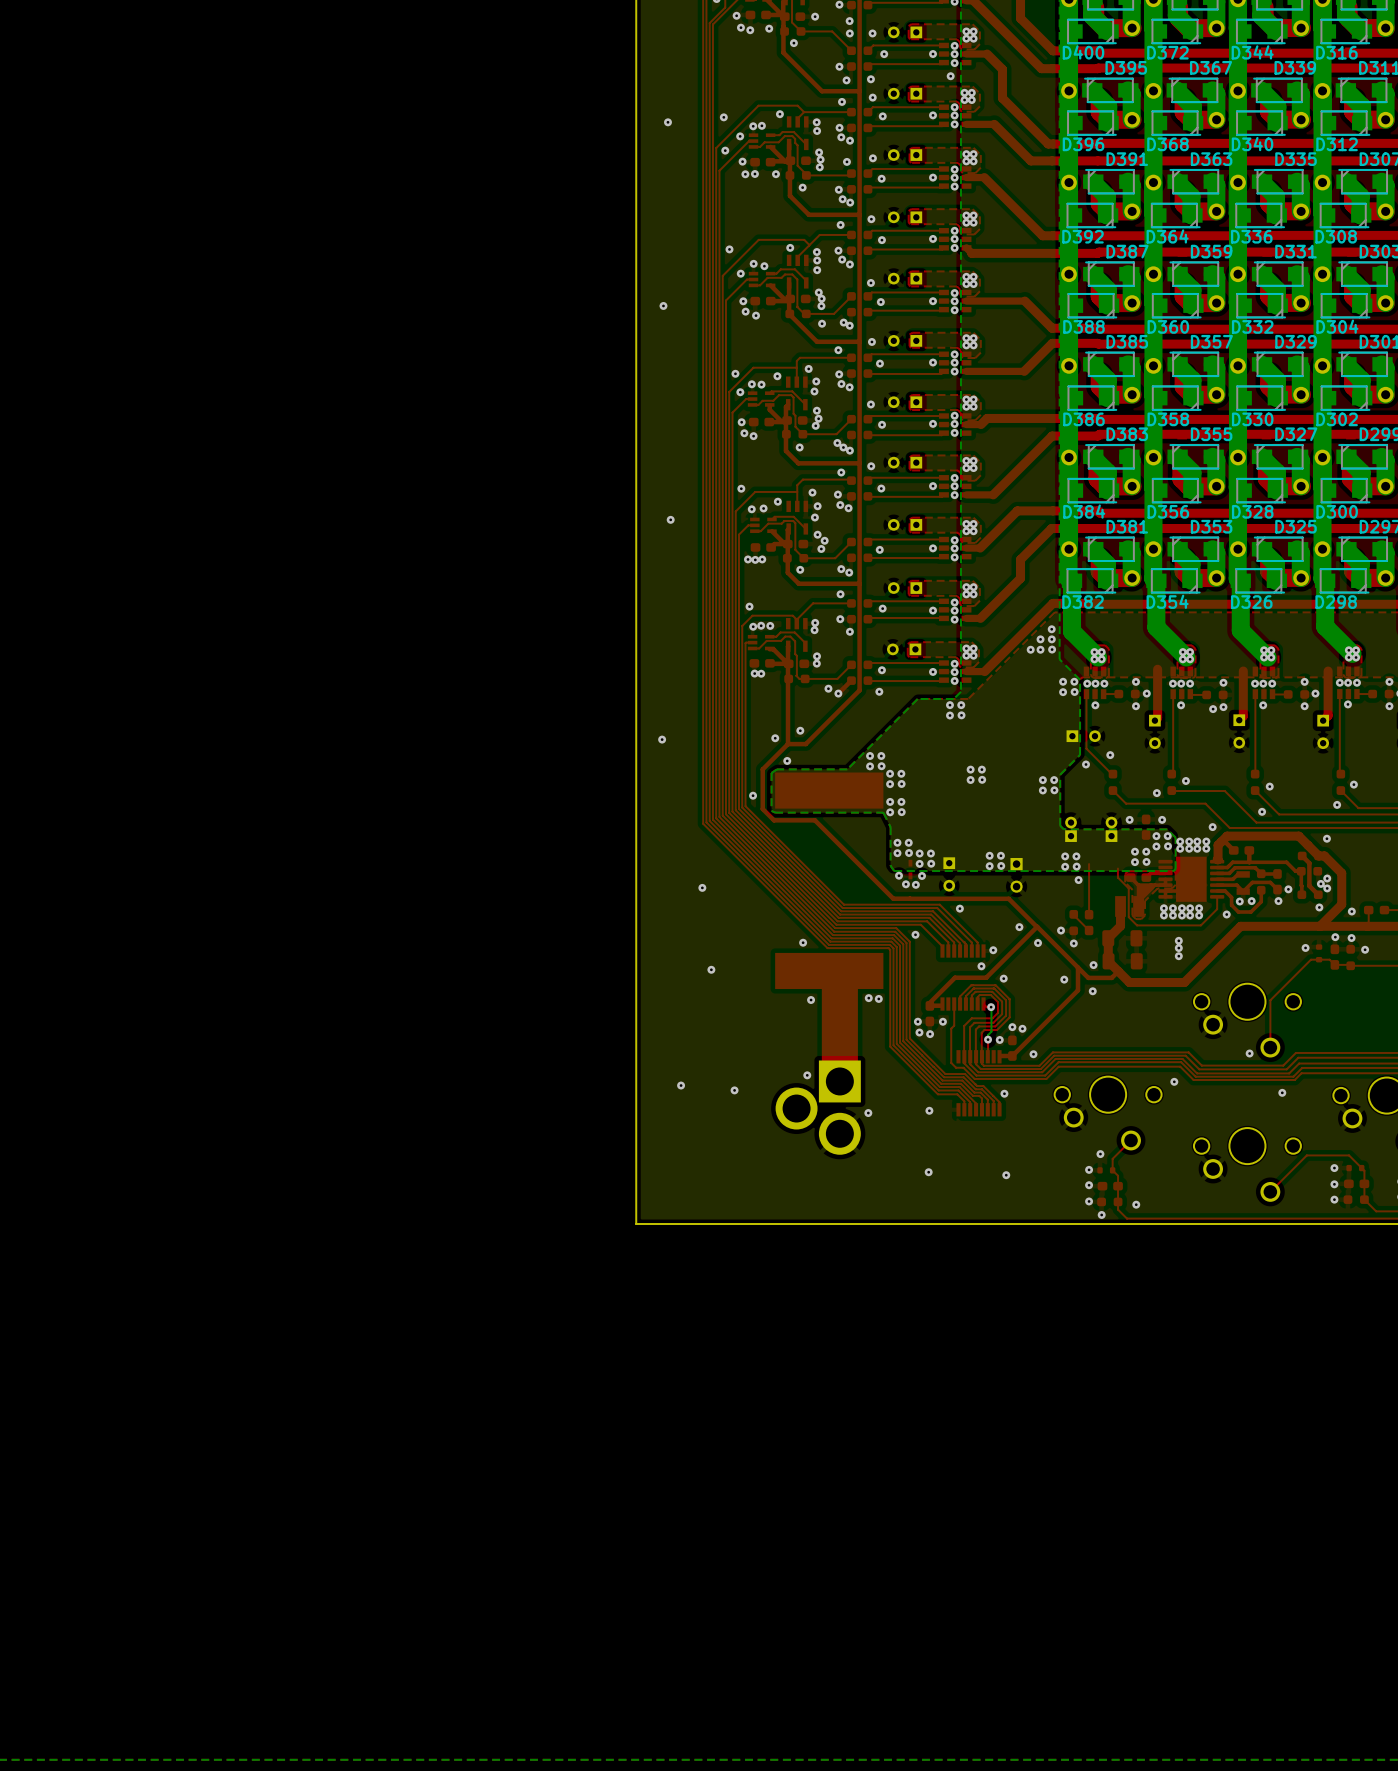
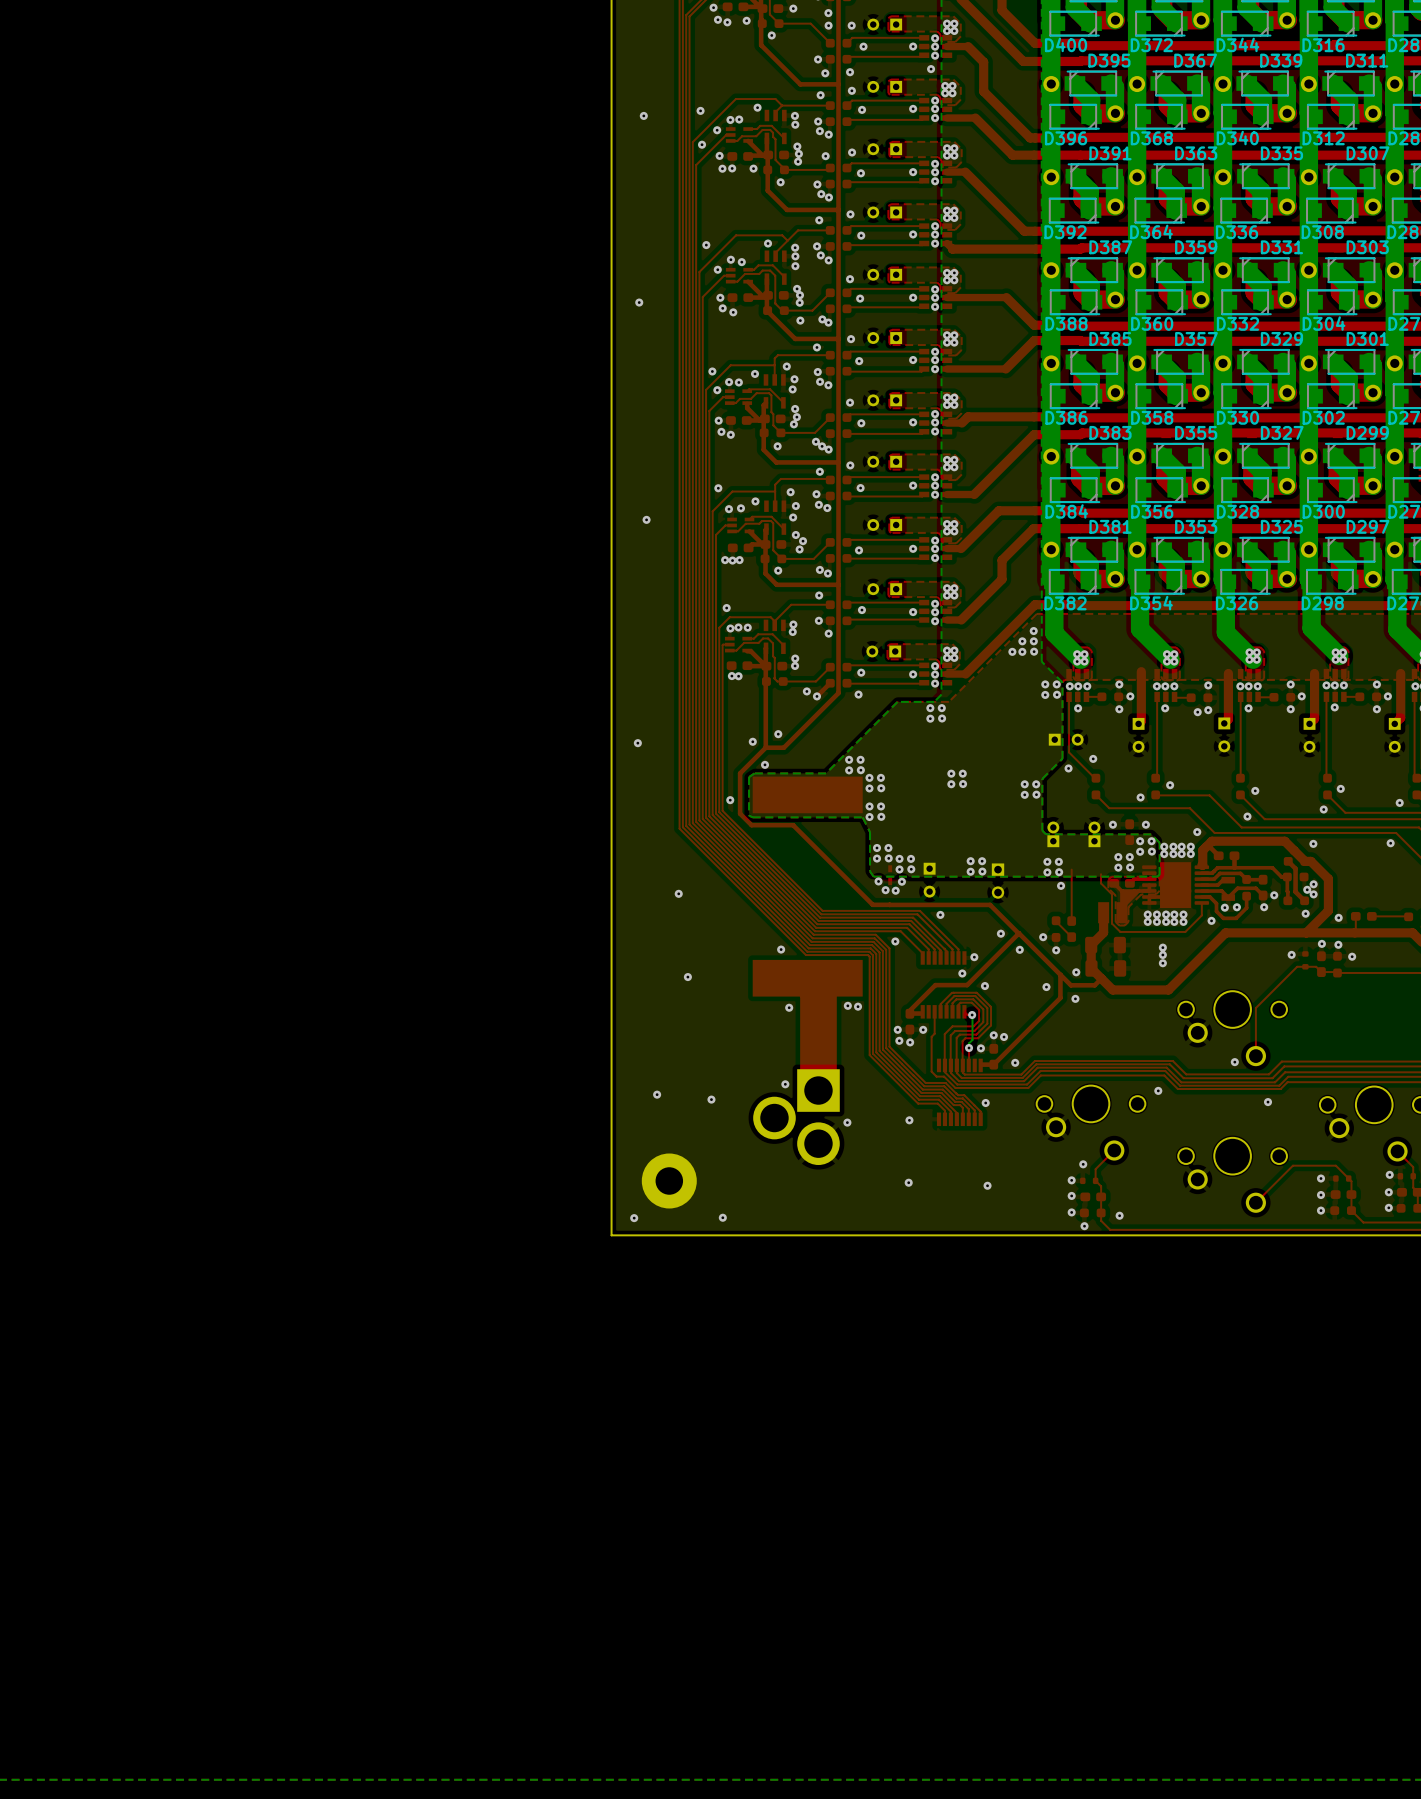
part: none -> (669, 1180)
via: none -> (722, 1217)
via: none -> (634, 1218)

